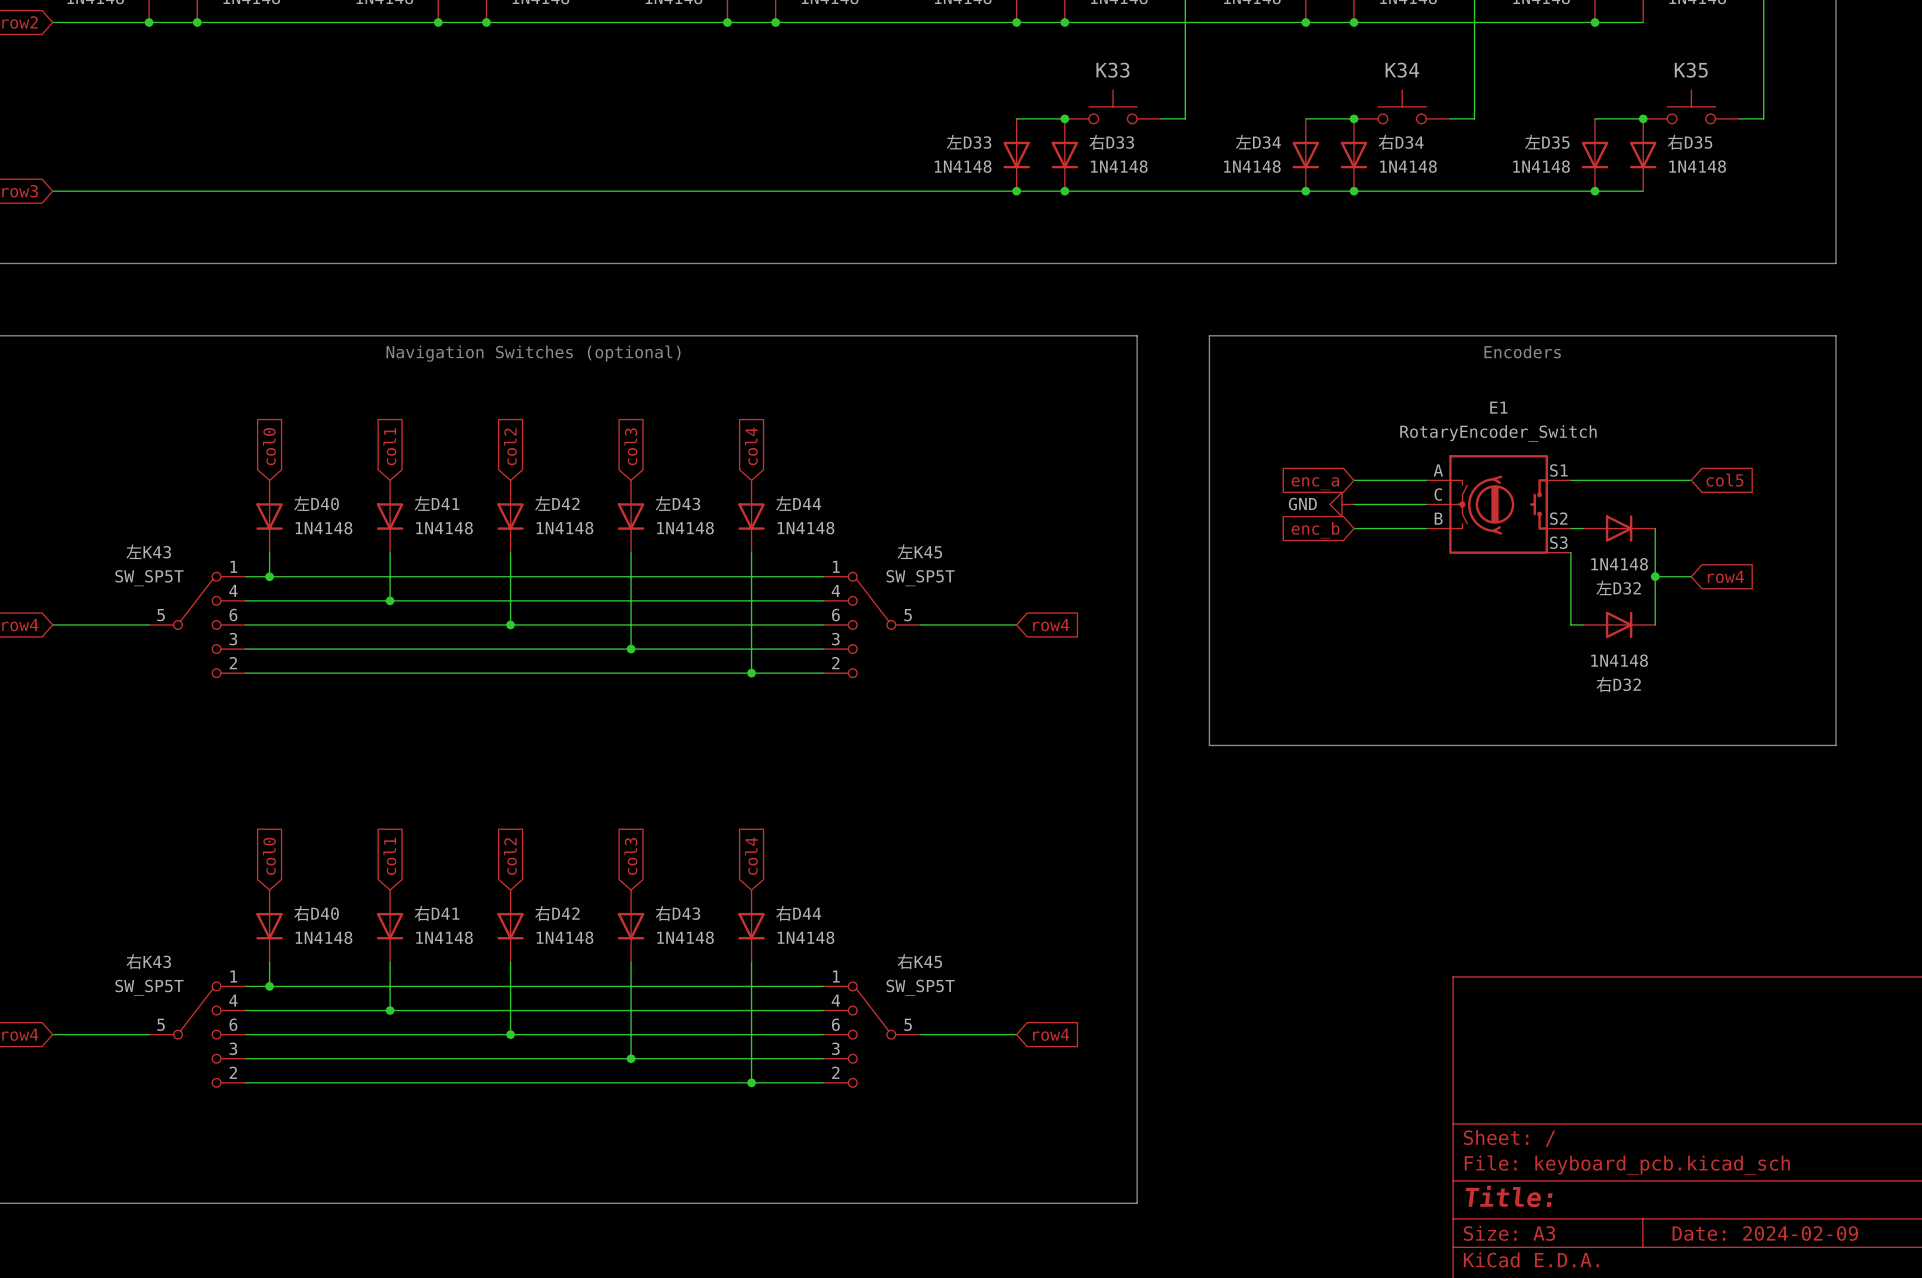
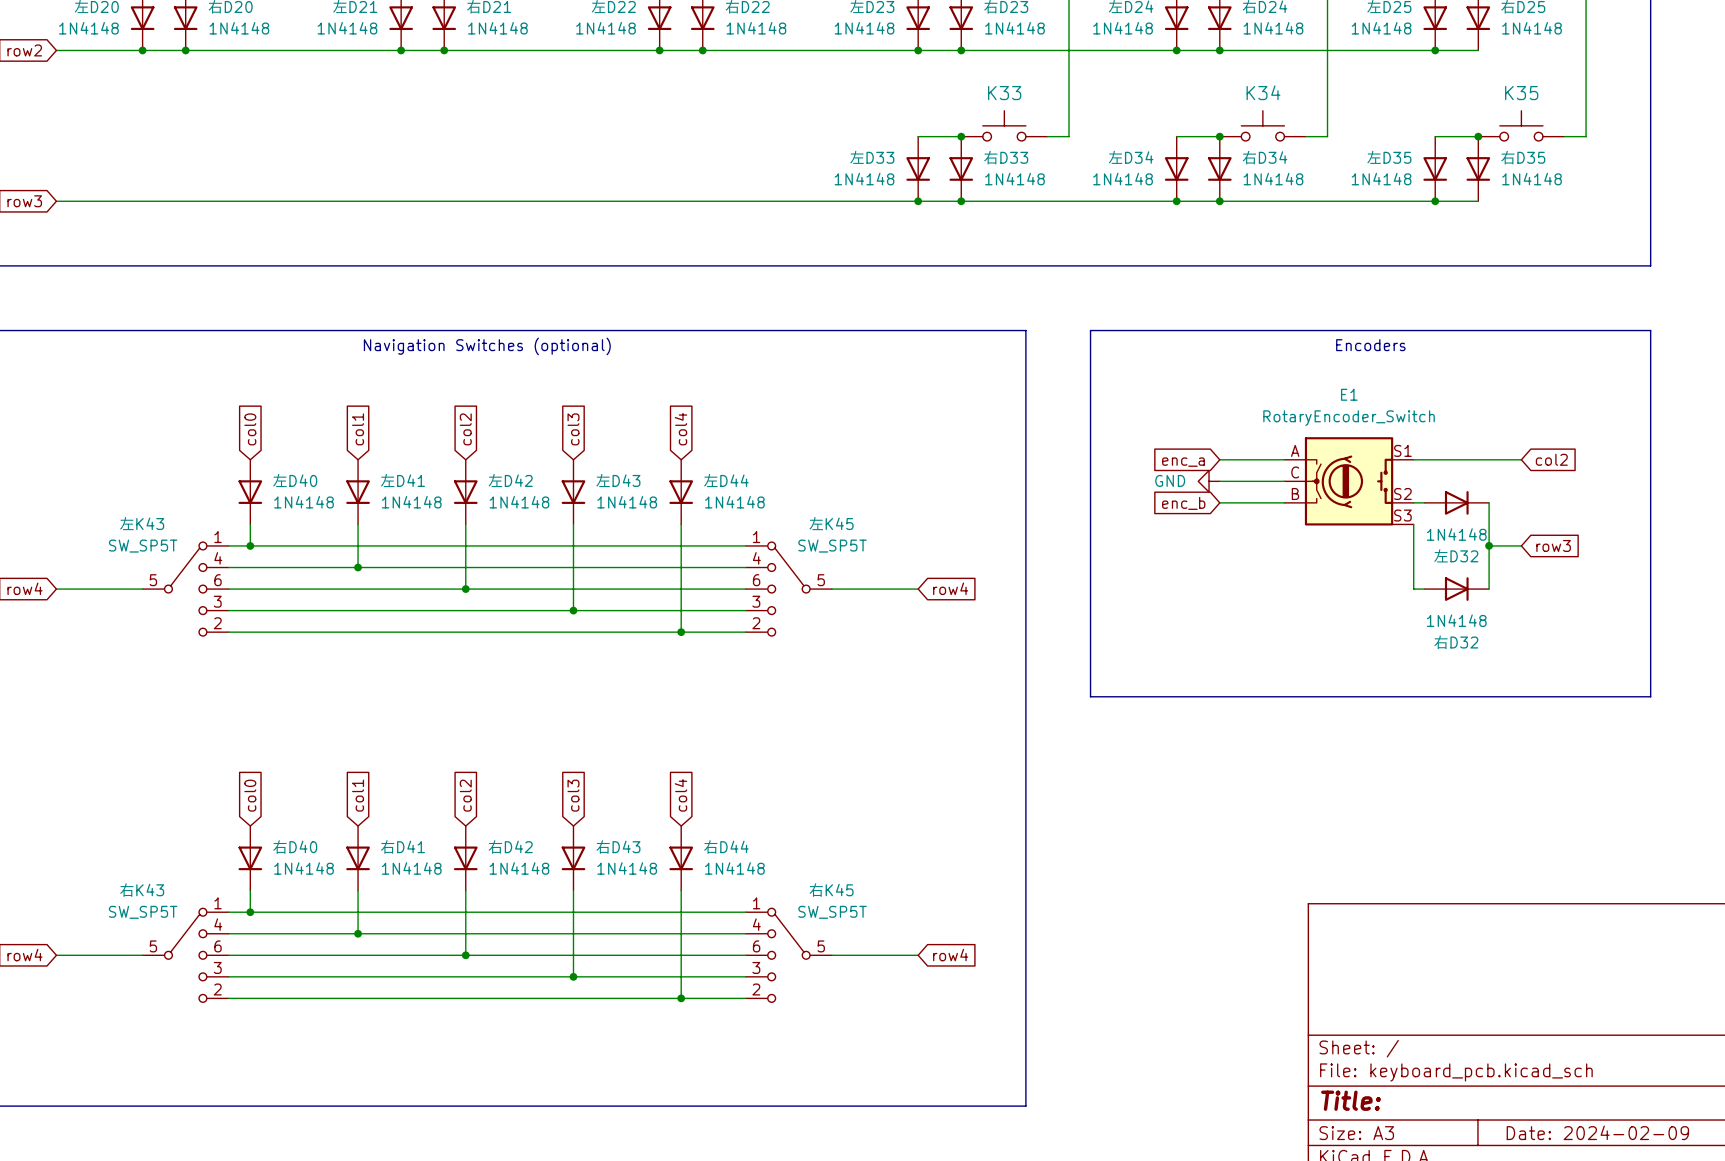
global label: col5 (1724, 480) -> col2 (1551, 459)
global label: row4 (1725, 576) -> row3 (1553, 545)

